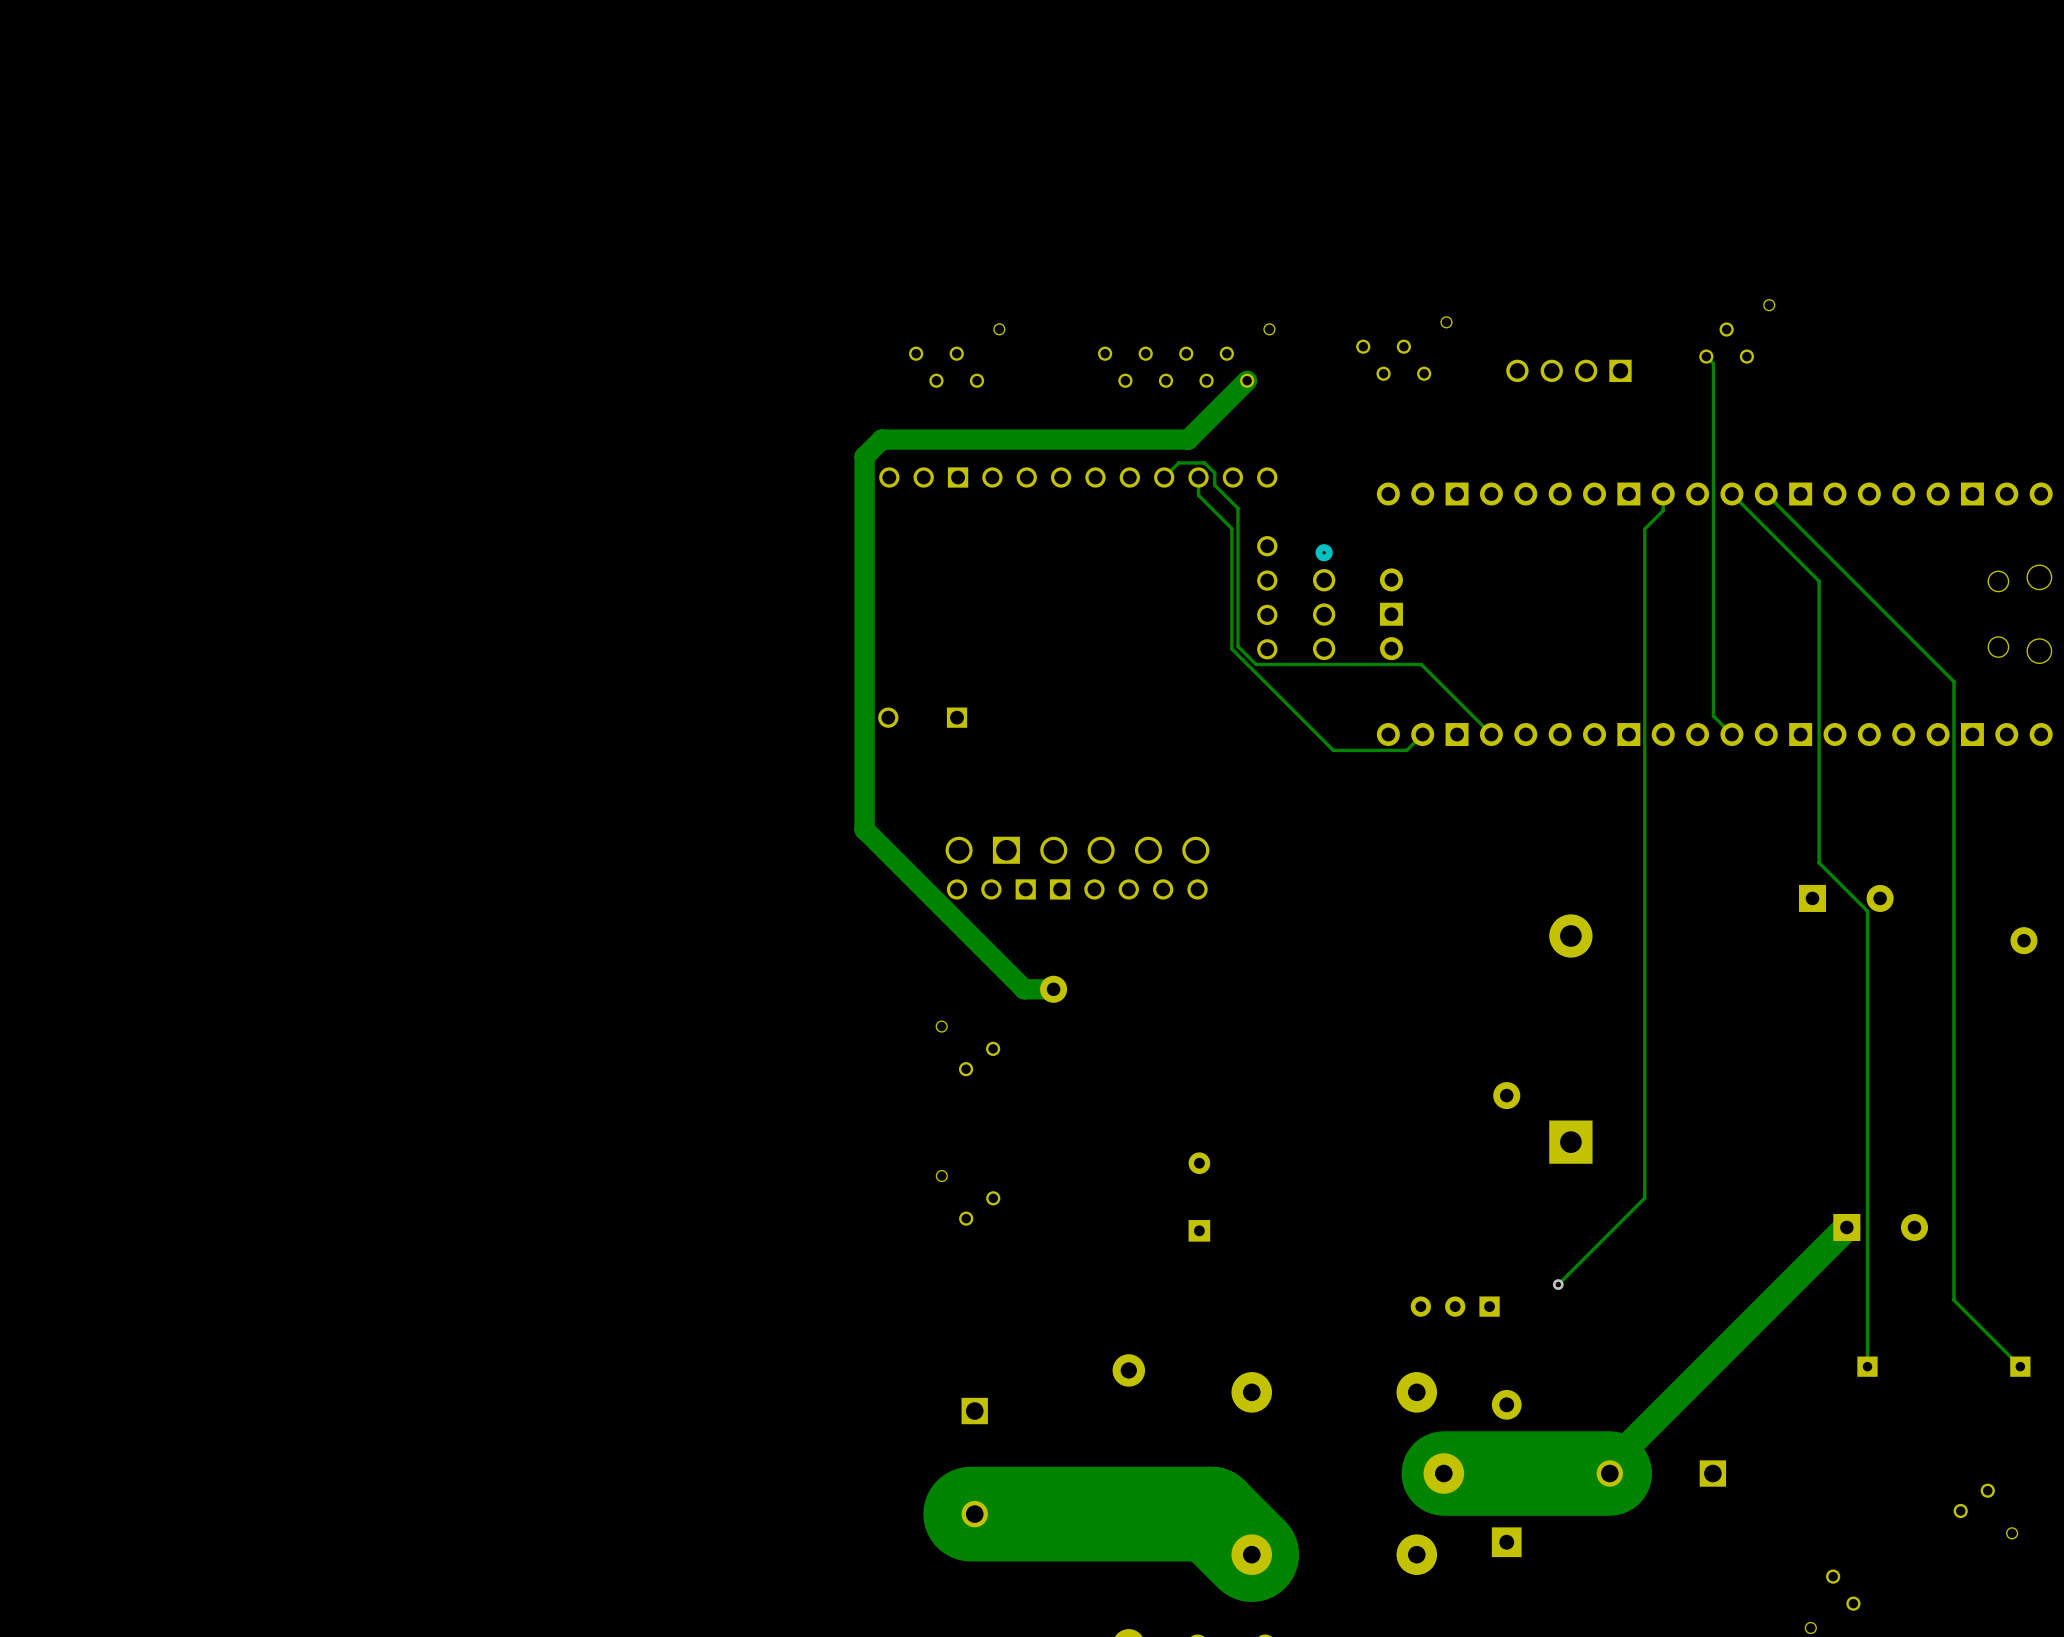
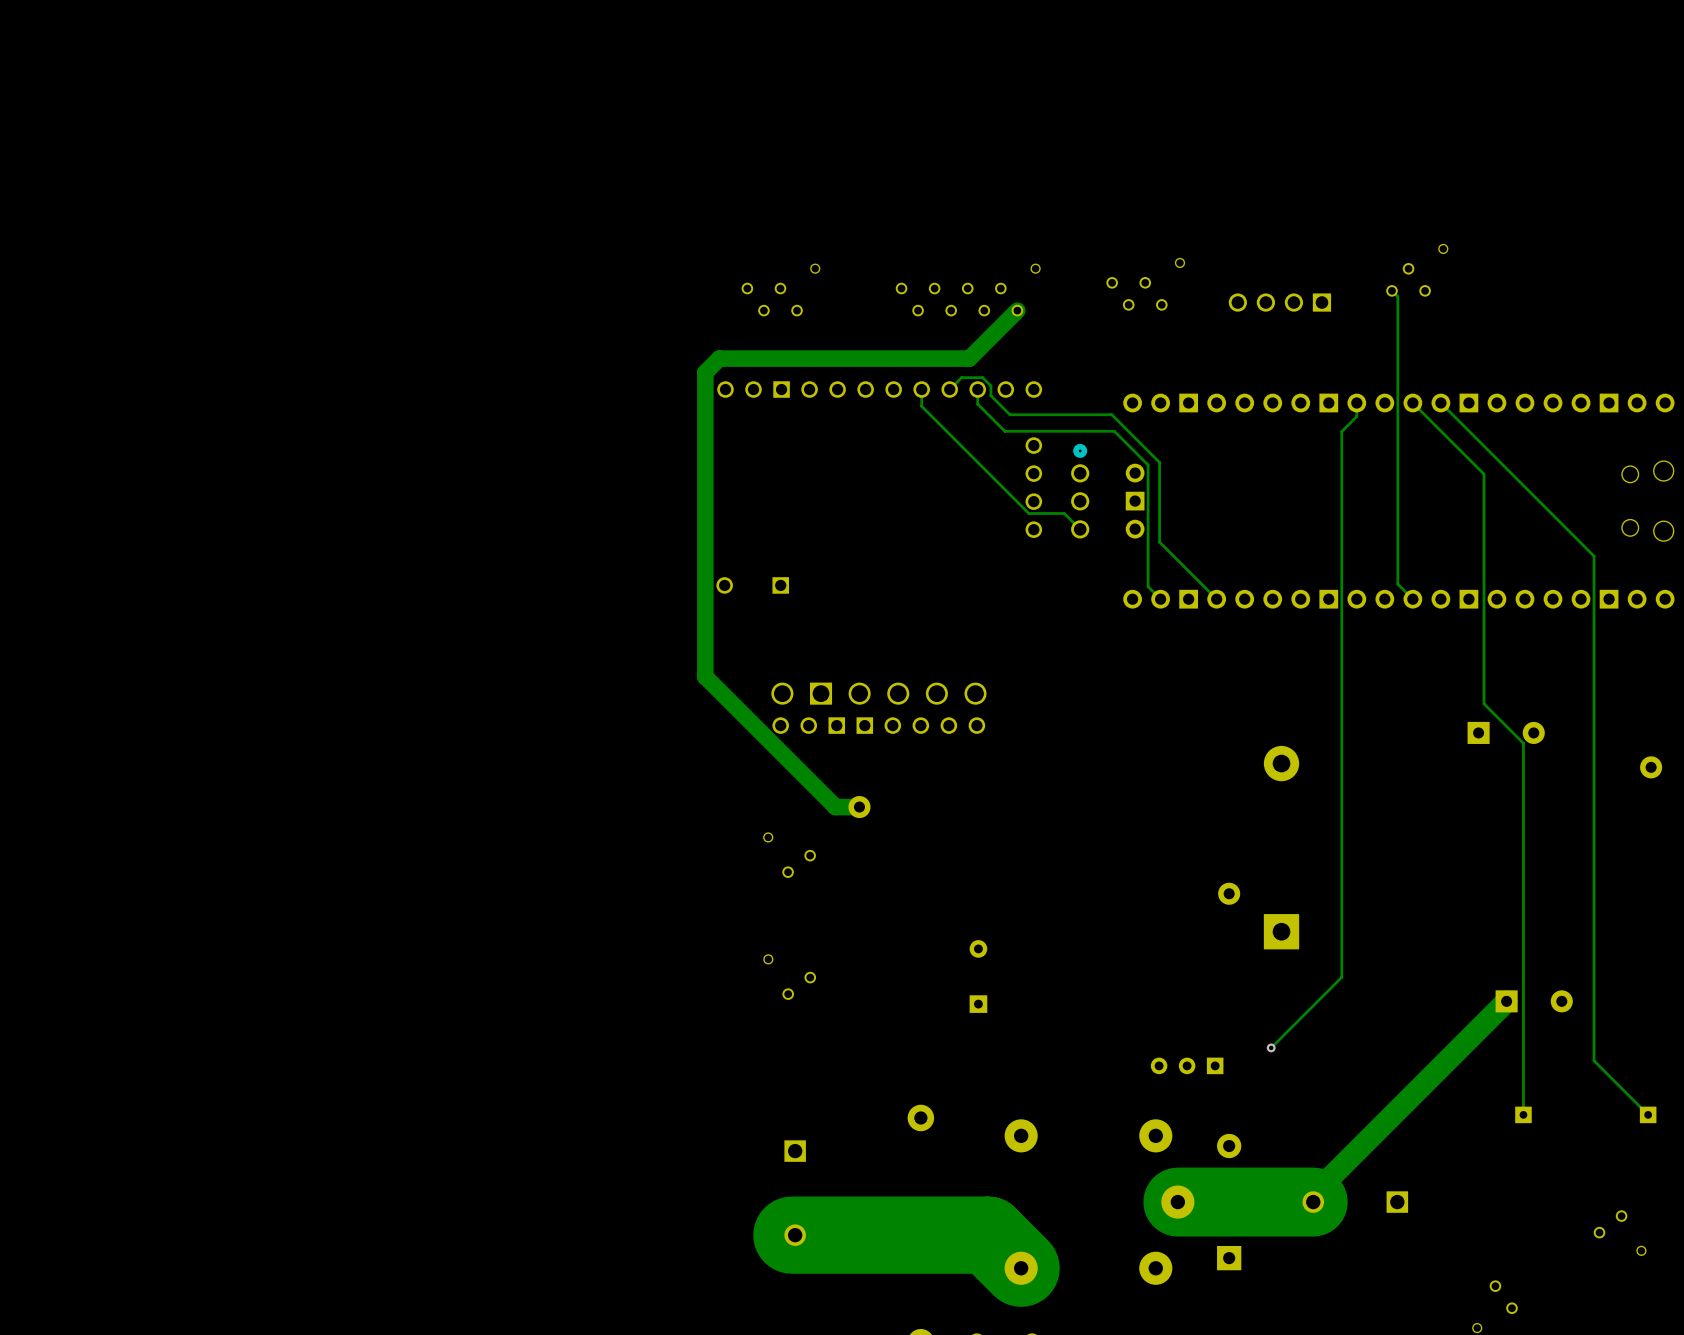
track: none -> (921, 389) (921, 406) (1028, 513) (1064, 513) (1080, 529)
track: (1237, 508) (1237, 646) (1256, 664) (1421, 664) -> (1009, 414) (1111, 414) (1159, 462) (1159, 542)
track: (1231, 528) (1231, 648) (1333, 750) (1406, 750) (1422, 734) -> (1004, 431) (1114, 431) (1148, 465) (1148, 586) (1160, 599)

